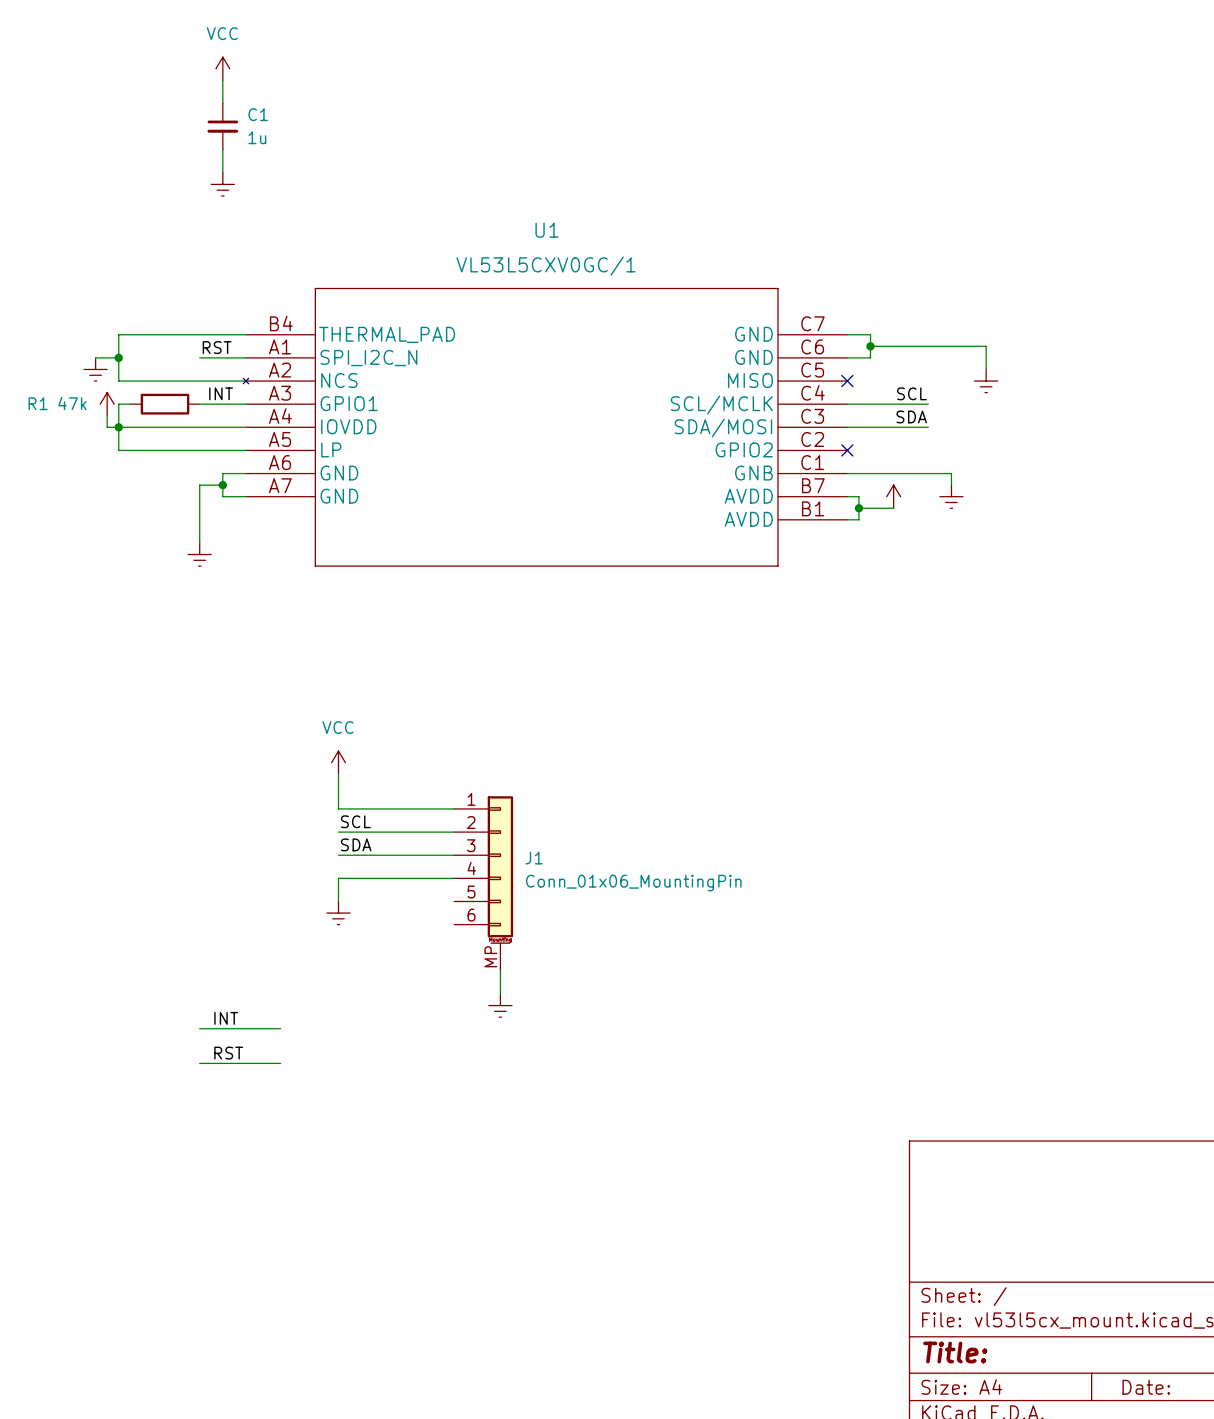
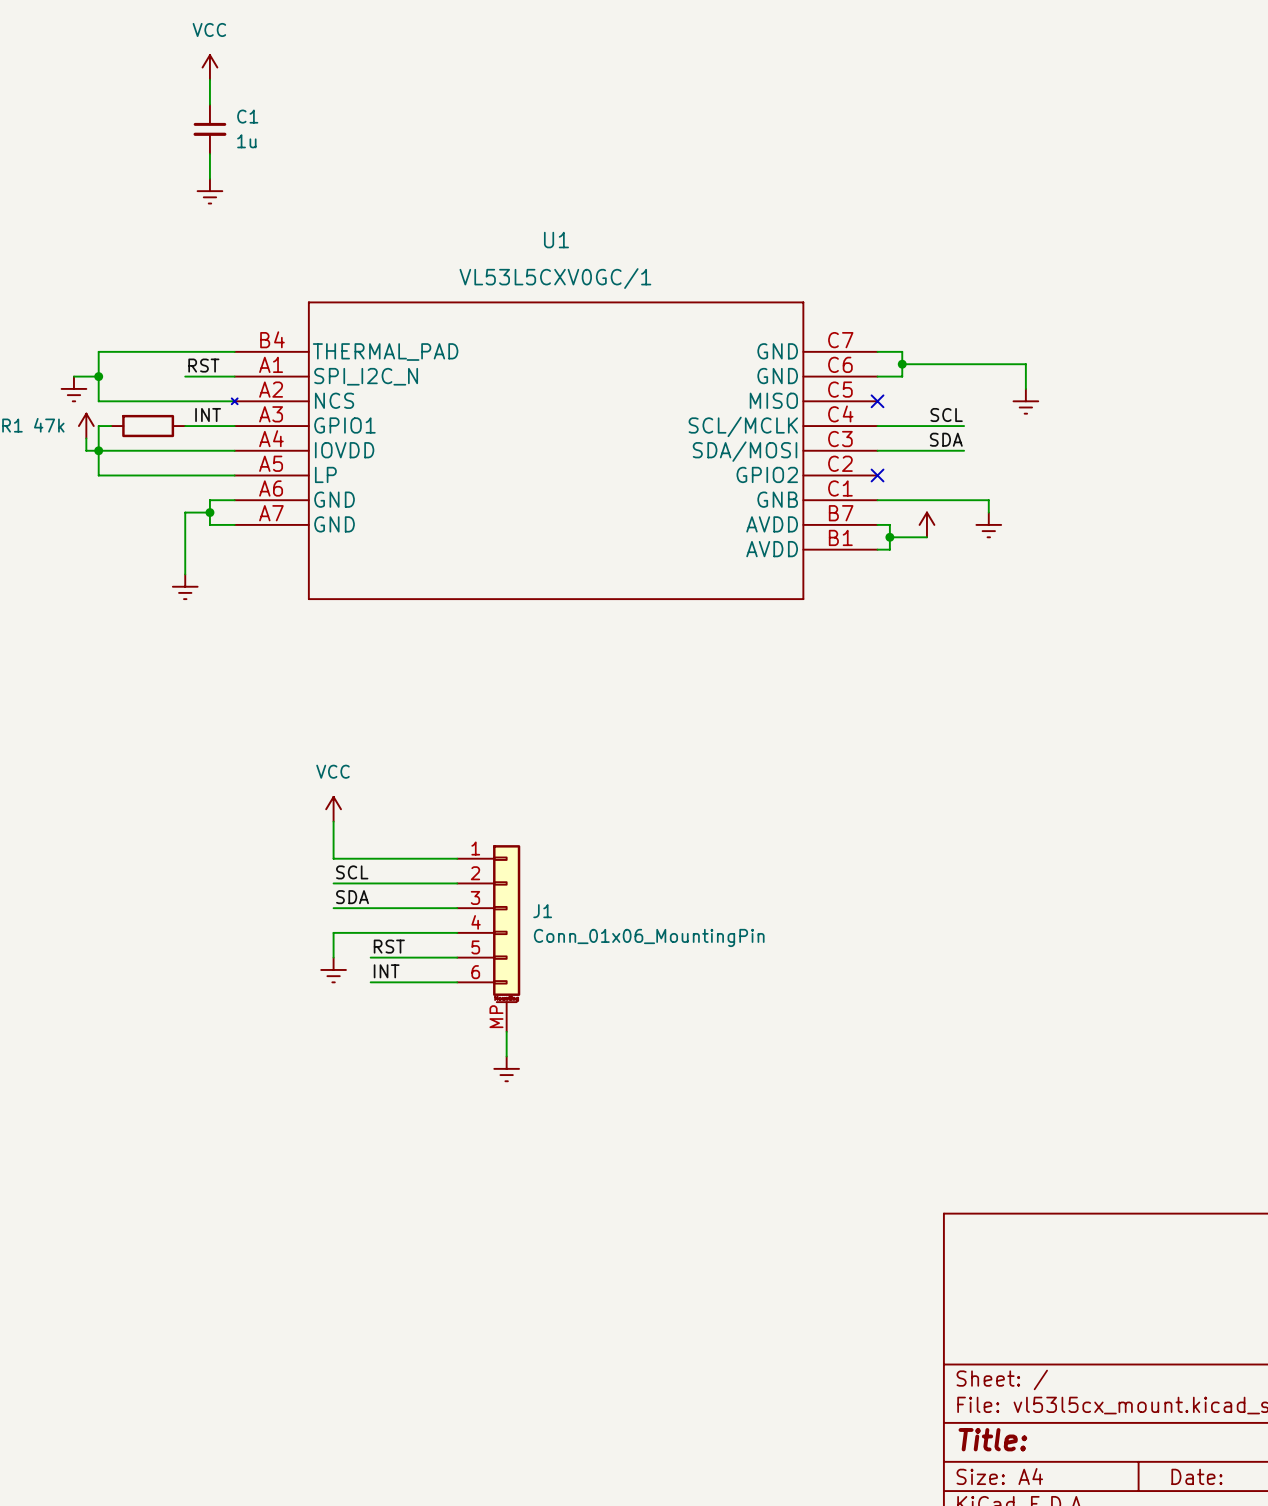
label: none -> RST (389, 946)
wire: none -> (370, 957) (457, 957)
label position: INT (226, 1018) -> INT (386, 971)
wire: (199, 1028) (280, 1028) -> (370, 982) (457, 982)
label: RST (228, 1053) -> none
wire: (199, 1063) (280, 1063) -> none

